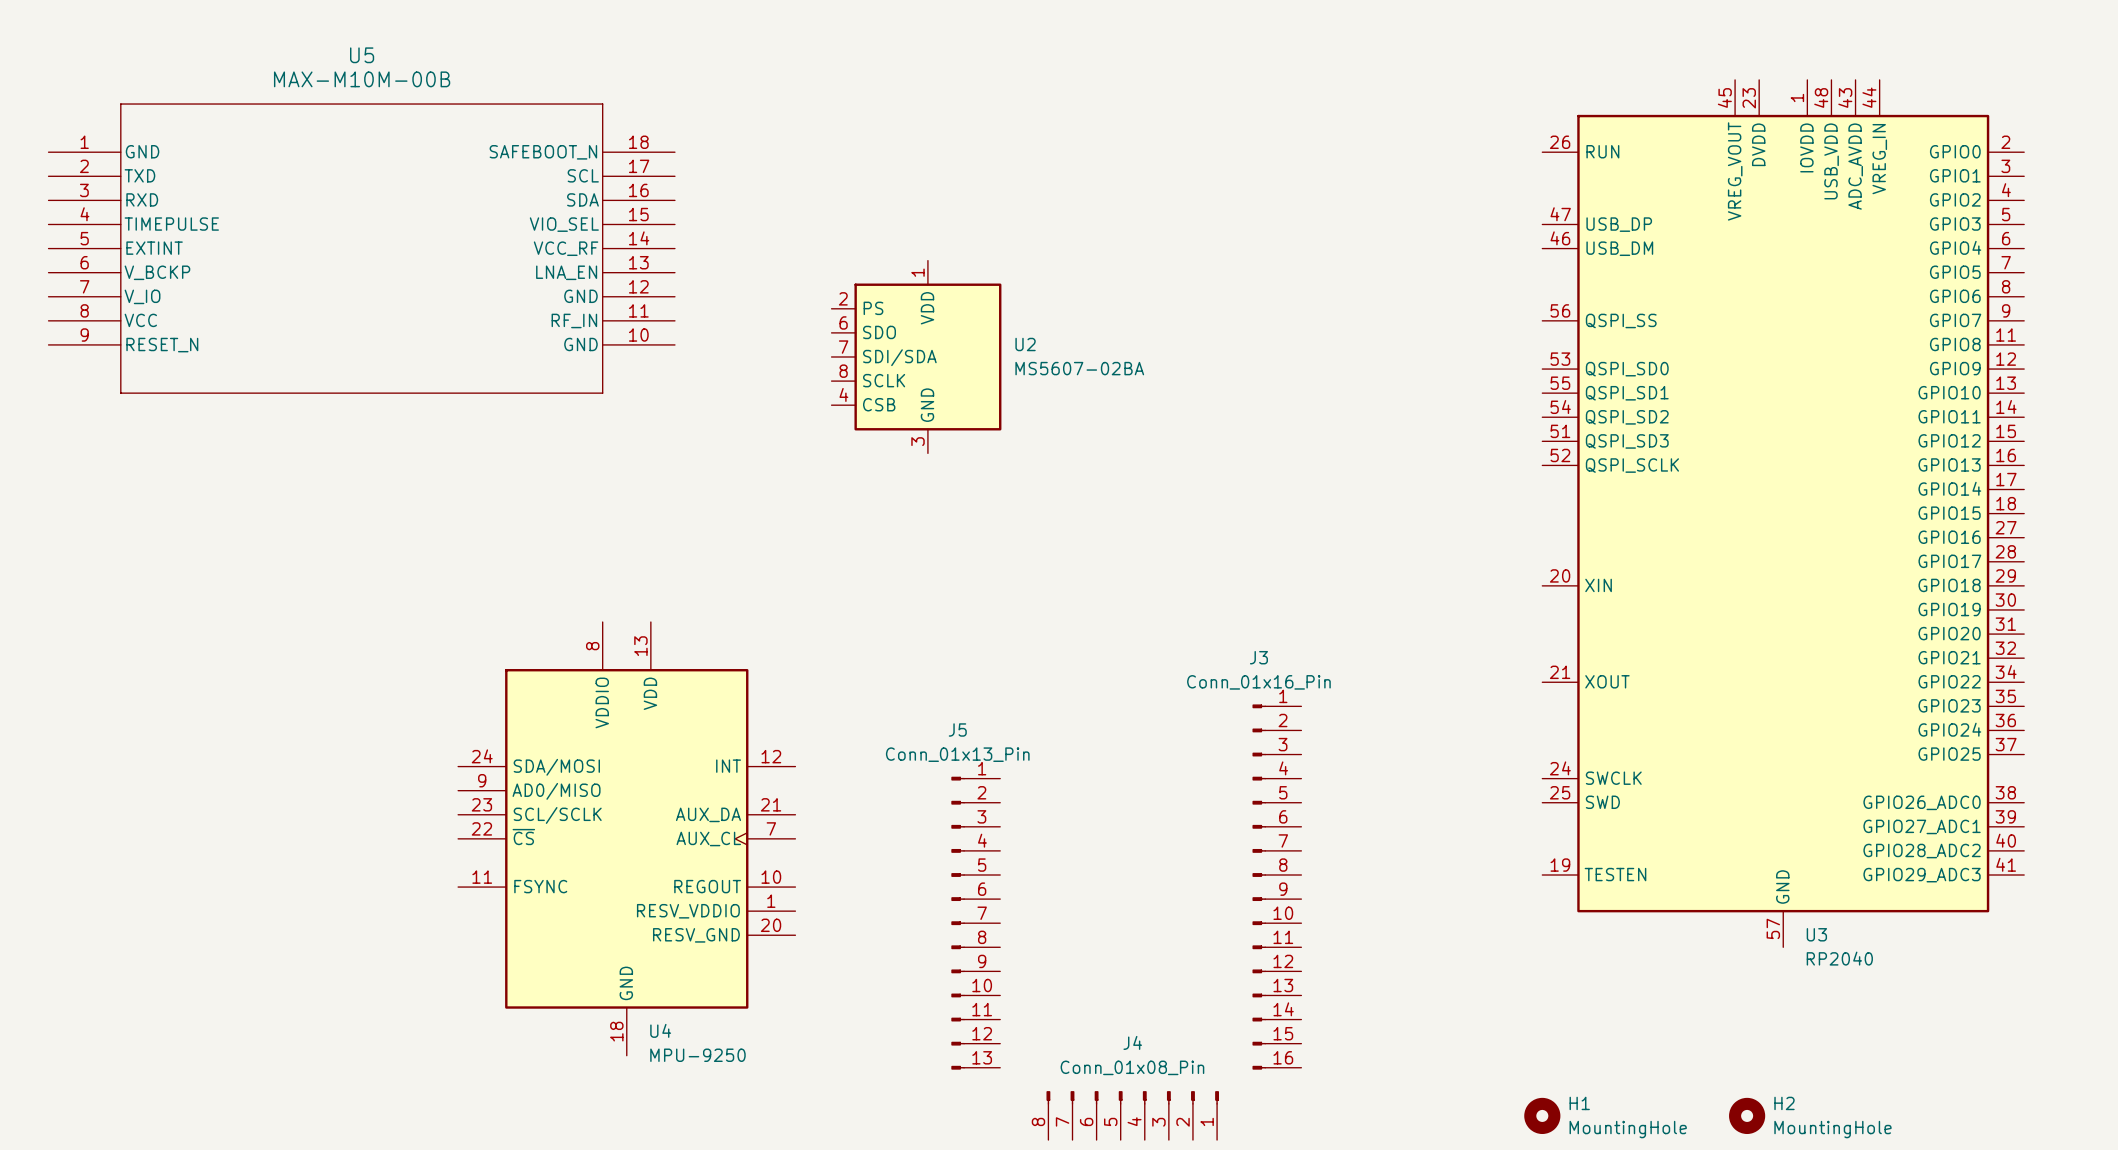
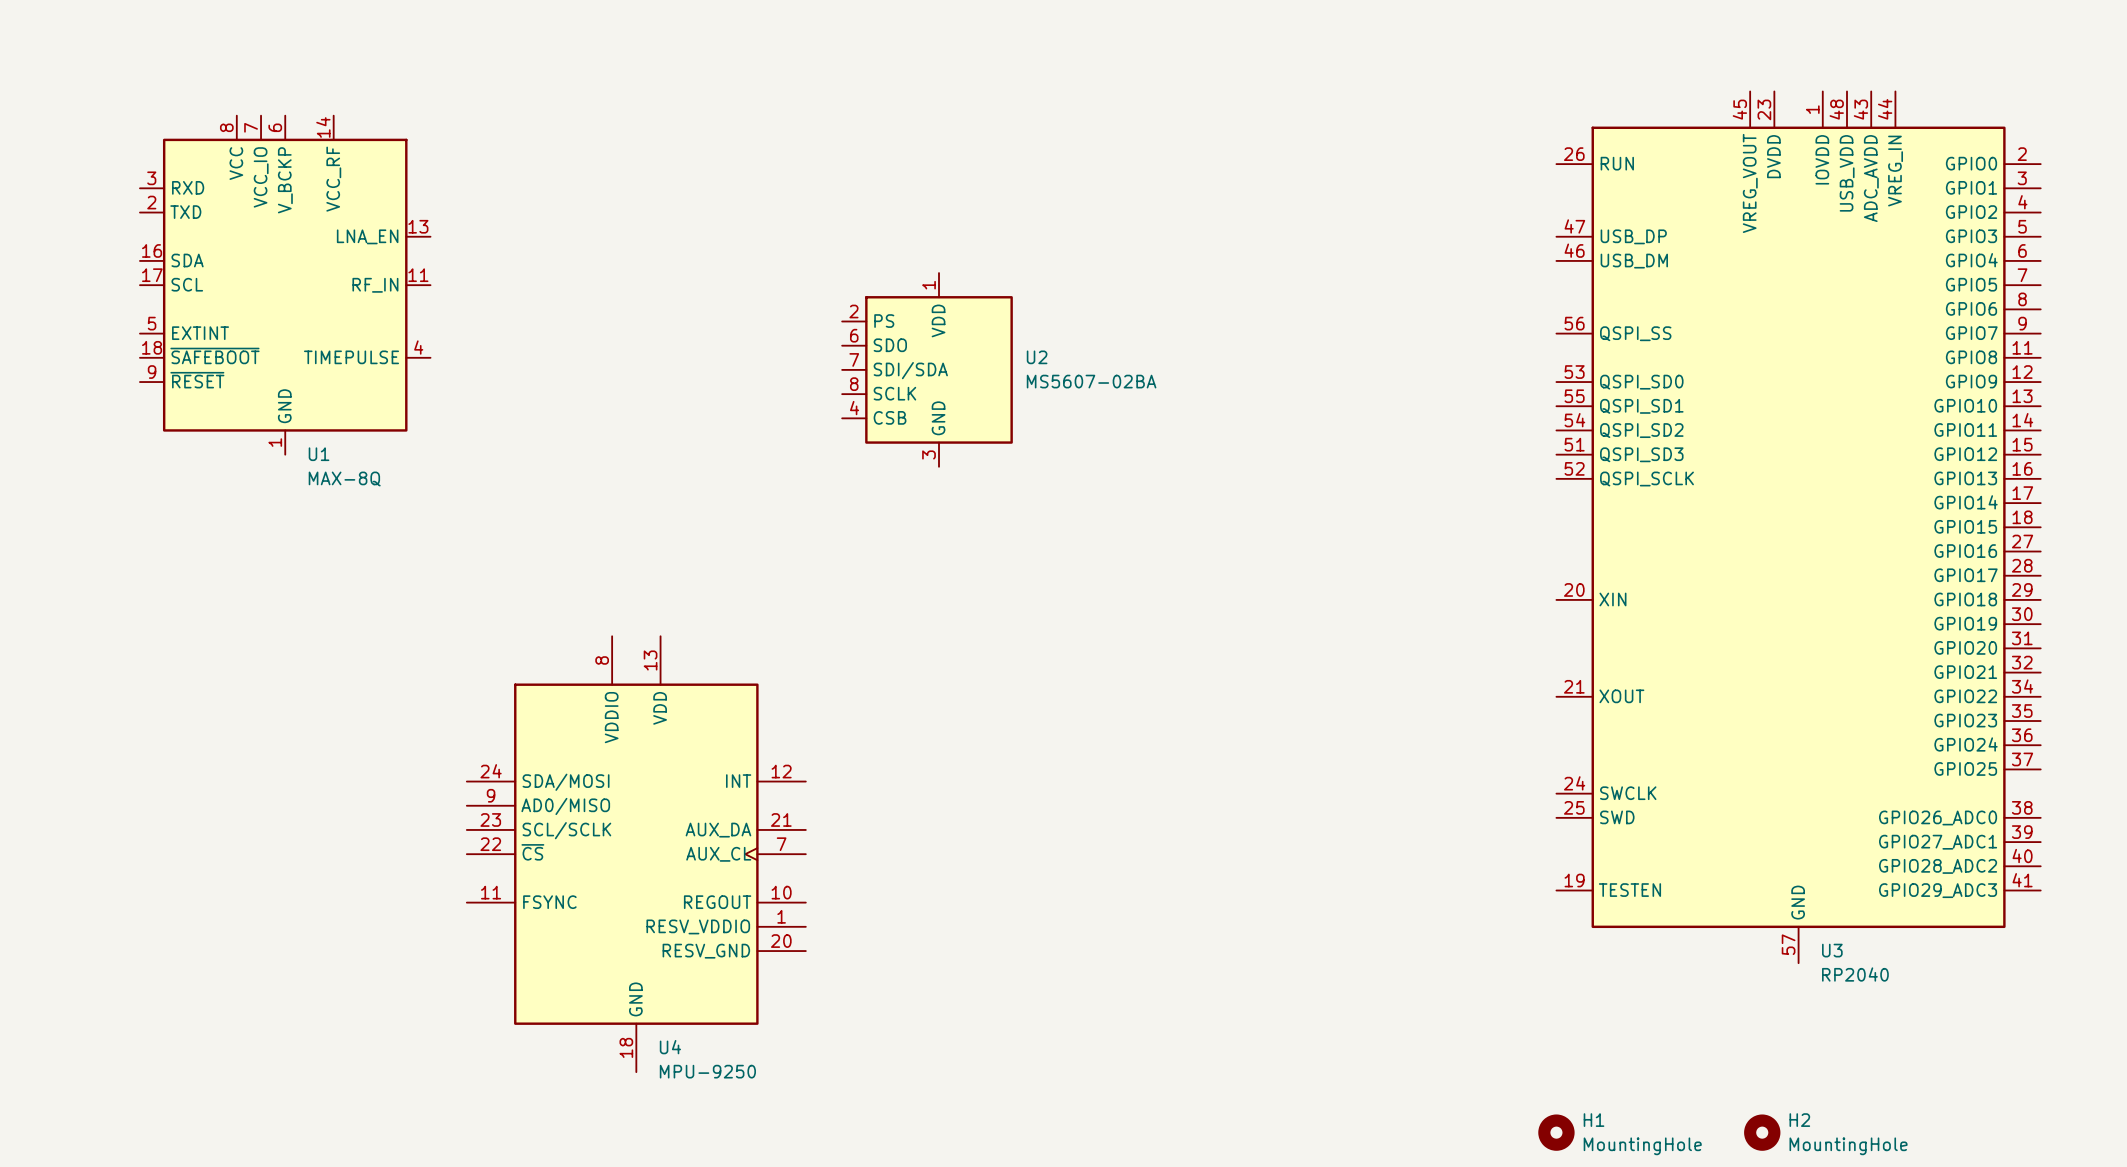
U5: MAX-M10M-00B (361, 248) -> none
U1: none -> MAX-8Q (285, 285)
J3: Conn_01x16_Pin (1276, 887) -> none
J5: Conn_01x13_Pin (975, 923) -> none
J4: Conn_01x08_Pin (1132, 1115) -> none

